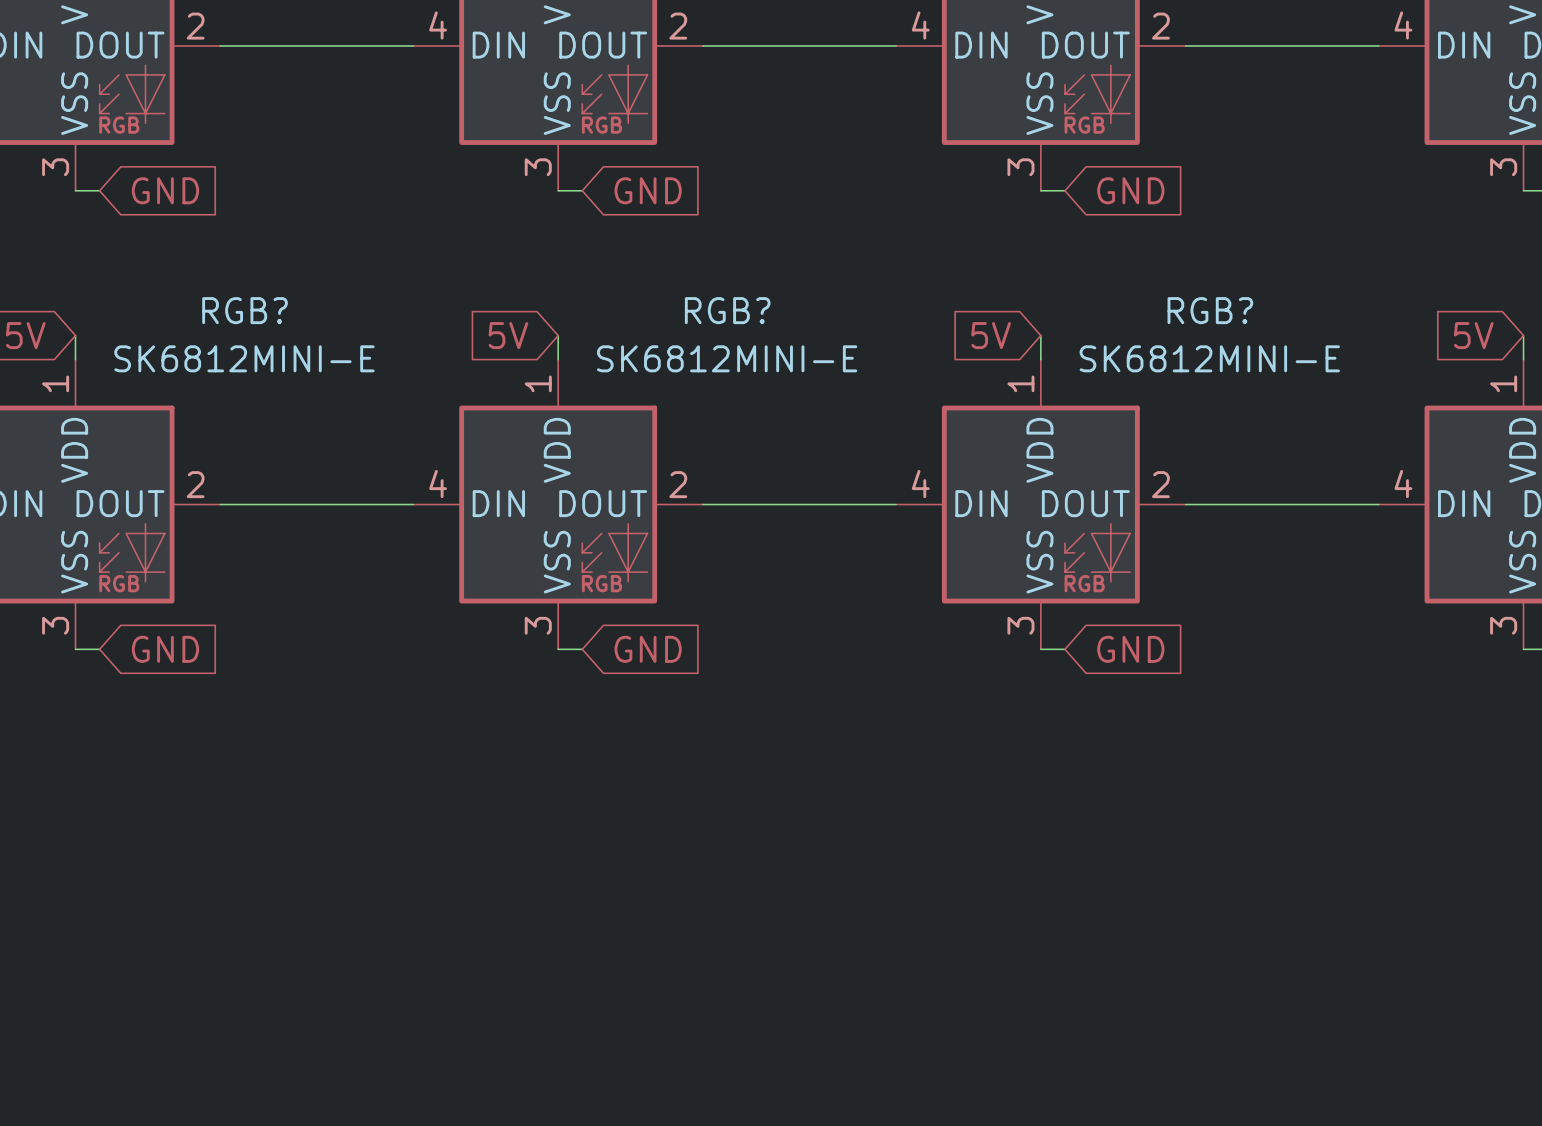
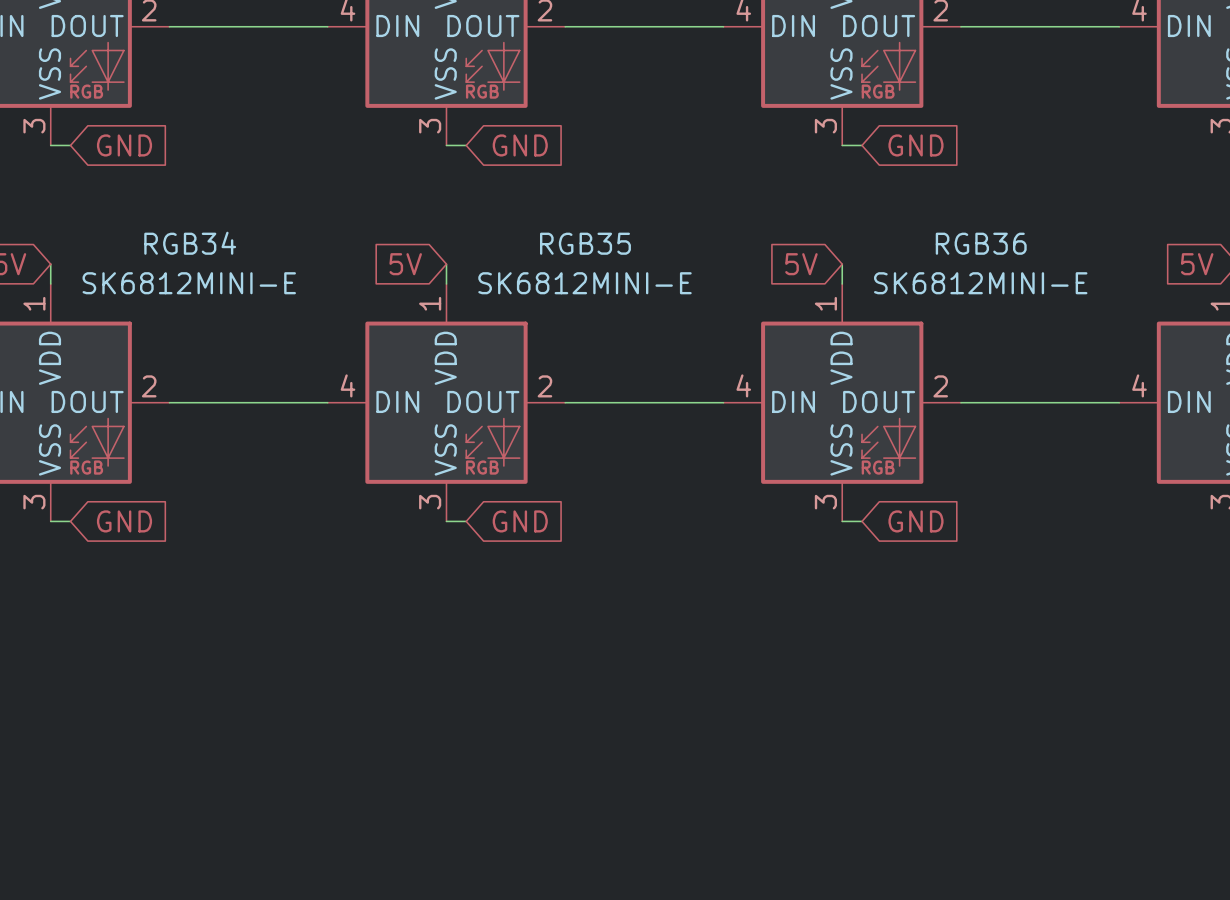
RGB? name: RGB? (245, 310) -> RGB34 (190, 243)
RGB? name: RGB? (727, 310) -> RGB35 (585, 243)
RGB? name: RGB? (1210, 310) -> RGB36 (981, 243)

